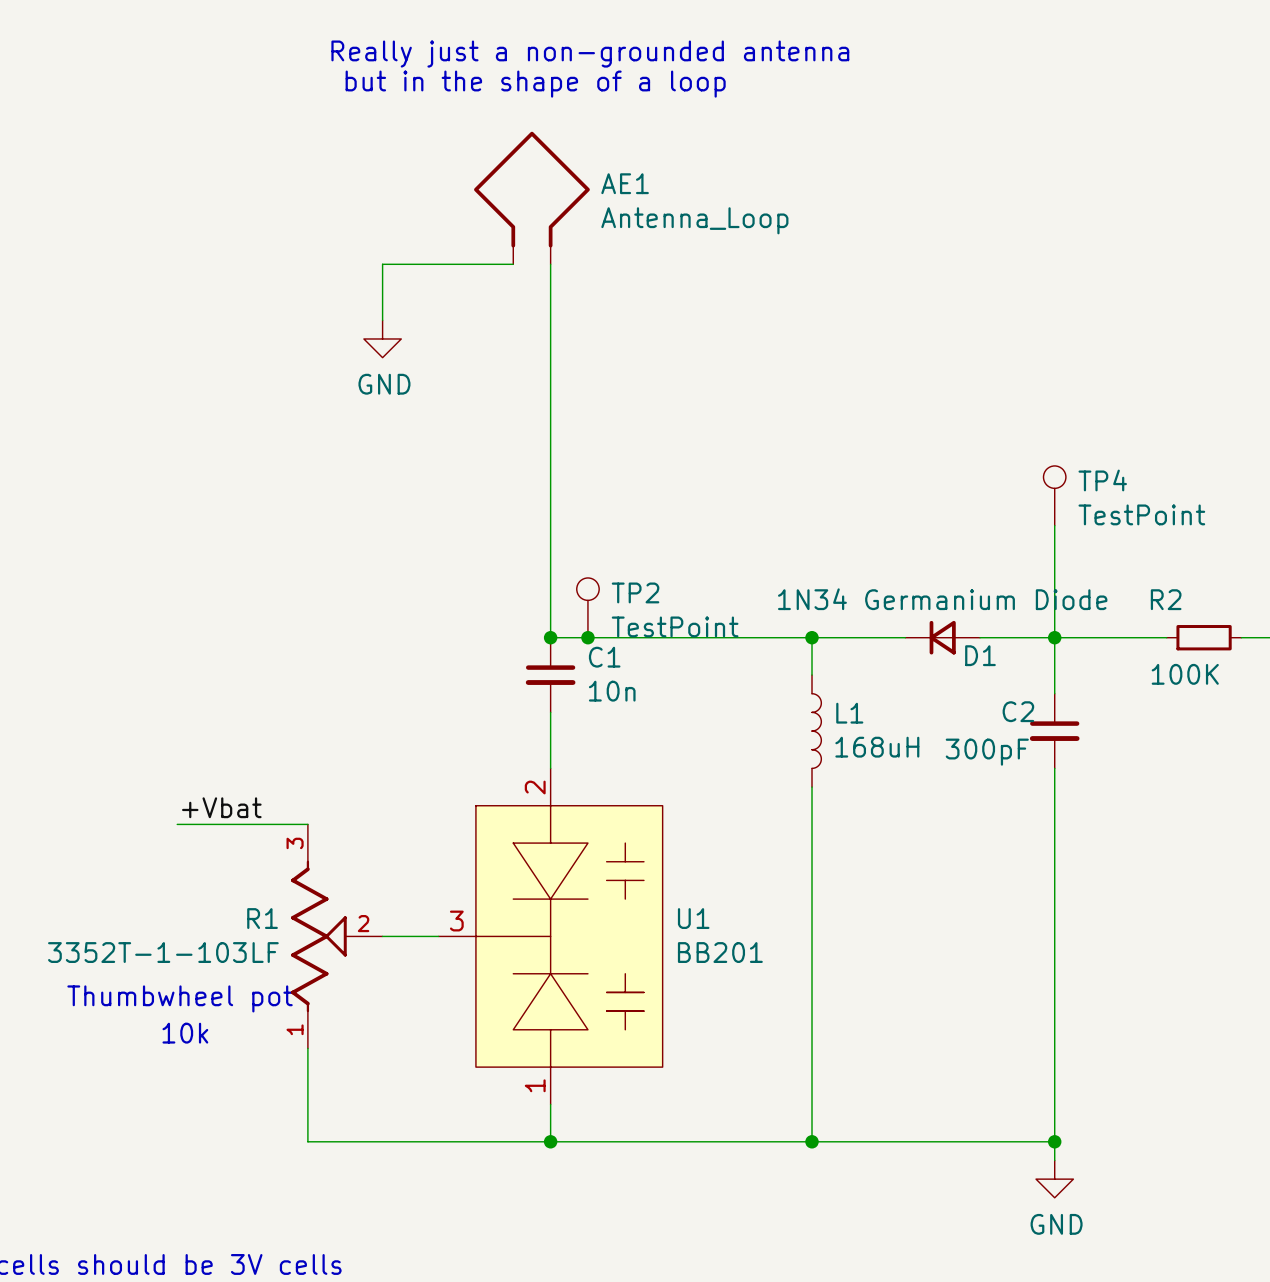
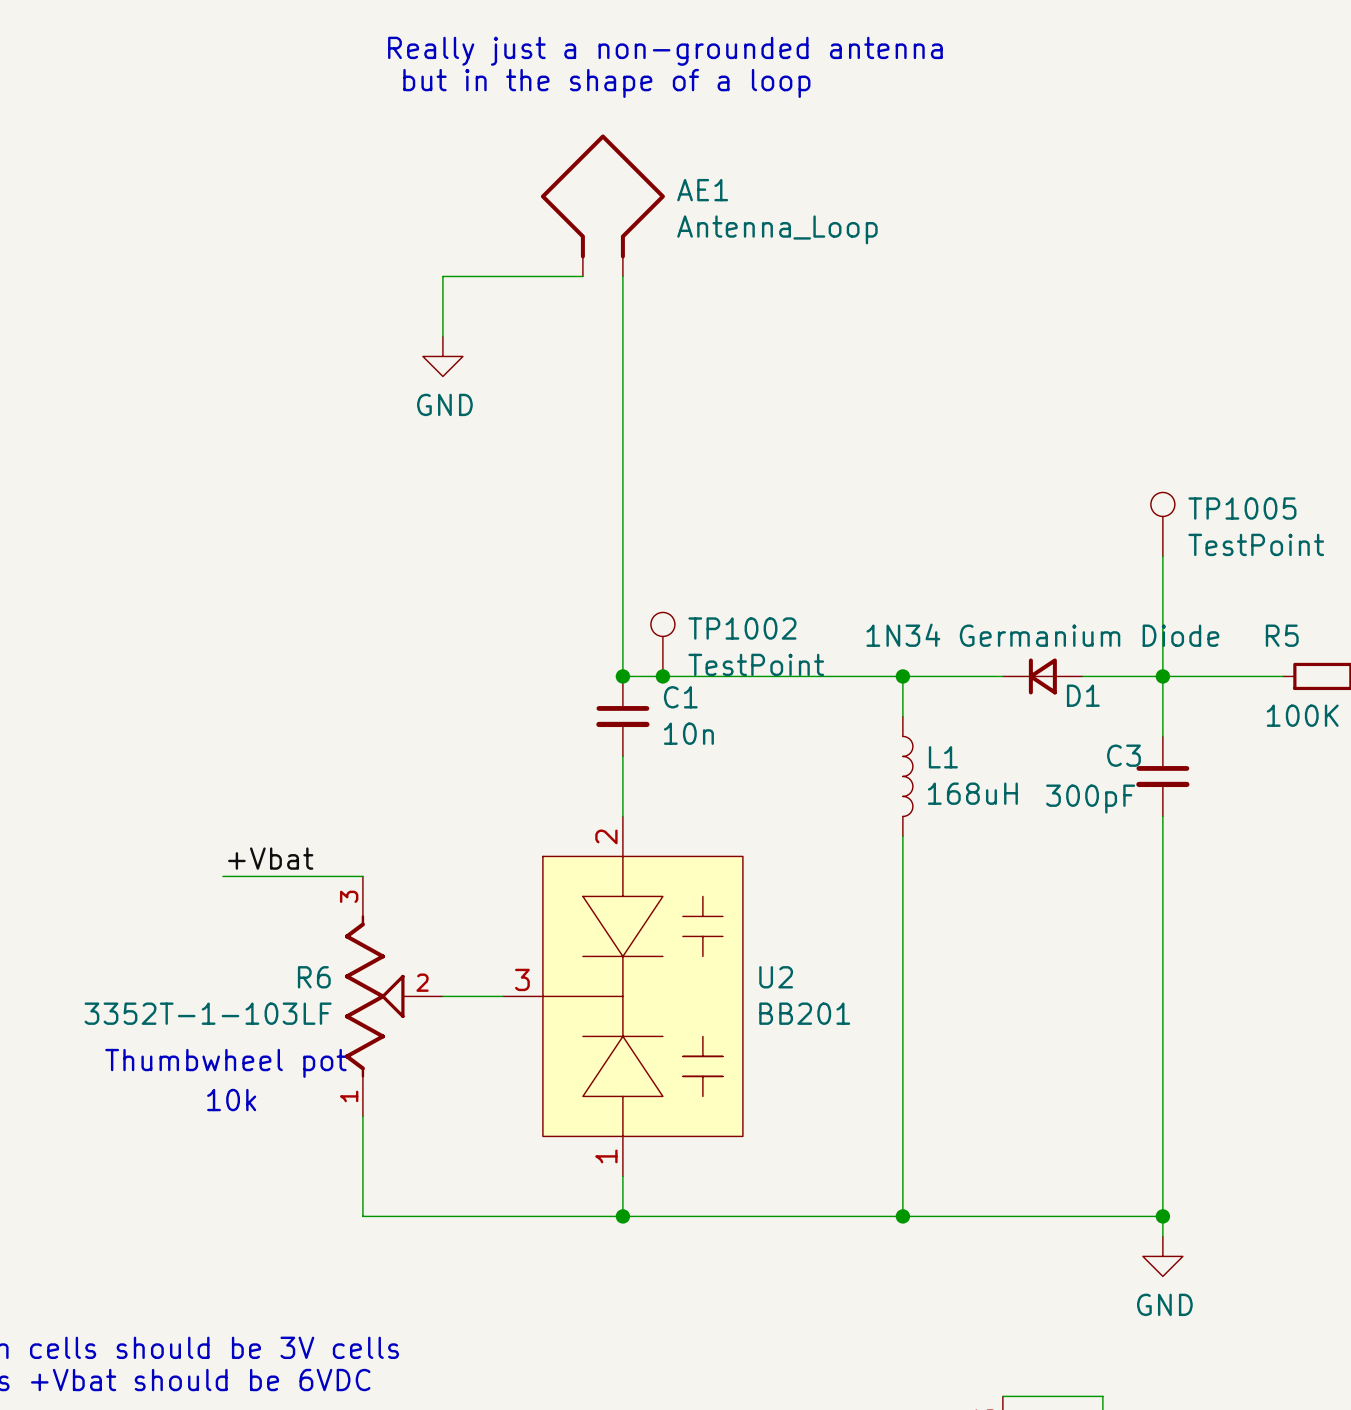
TP4 name: TP4 (1102, 480) -> TP1005 (1242, 508)
TP2 name: TP2 (635, 592) -> TP1002 (742, 628)
R2 name: R2 (1166, 599) -> R5 (1282, 635)
C2 name: C2 (1018, 711) -> C3 (1123, 755)
R1 name: R1 (262, 918) -> R6 (314, 977)
U1 name: U1 (693, 918) -> U2 (776, 977)

